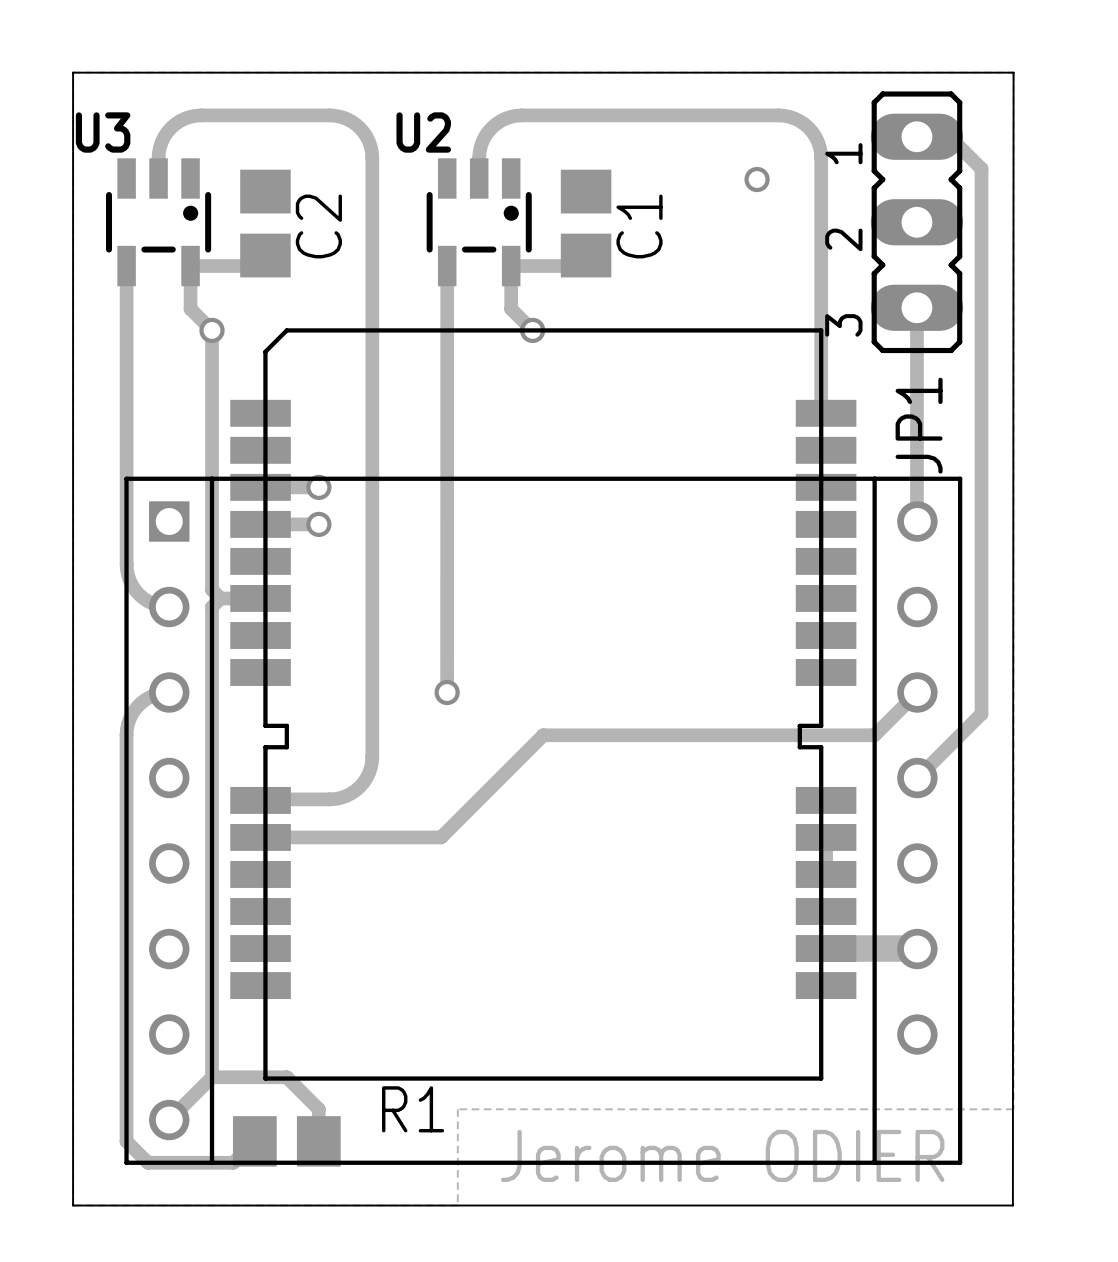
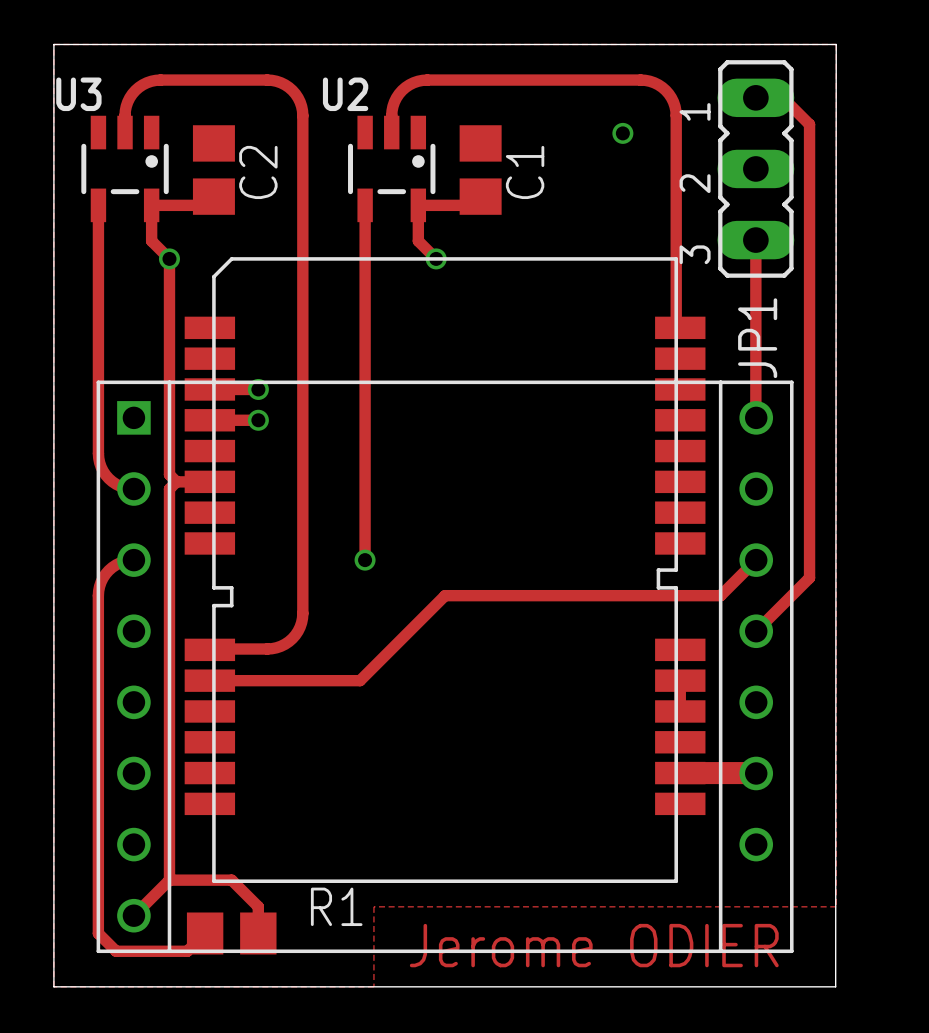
part footprint: [230, 328, 857, 1081] -> [184, 257, 706, 883]

